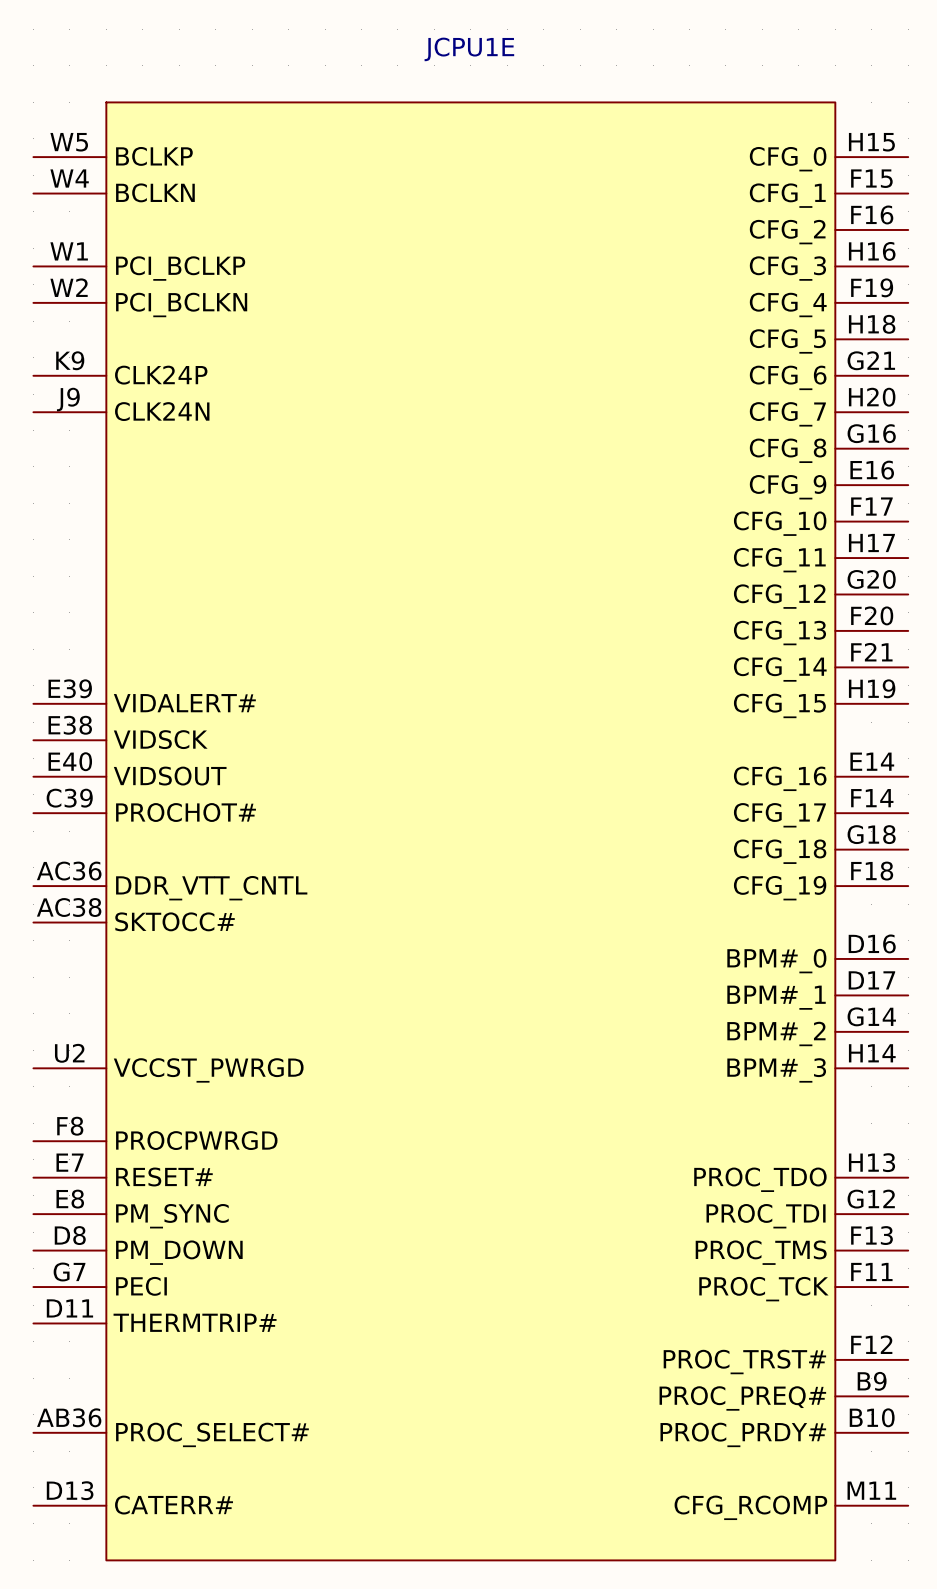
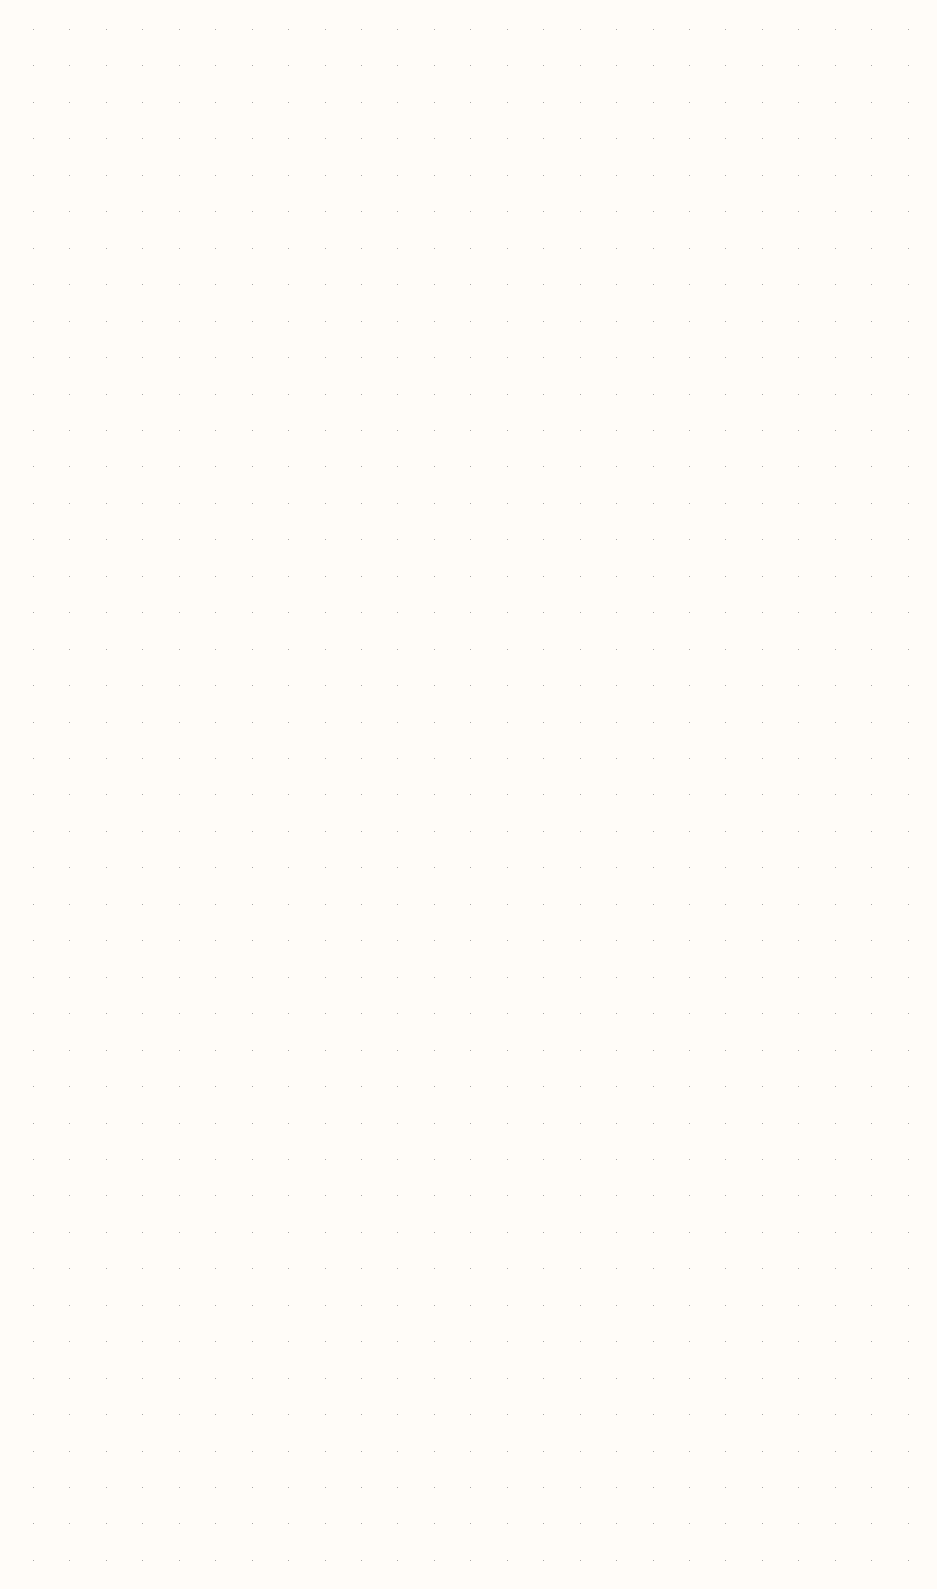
JCPU1E: (470, 831) -> none

